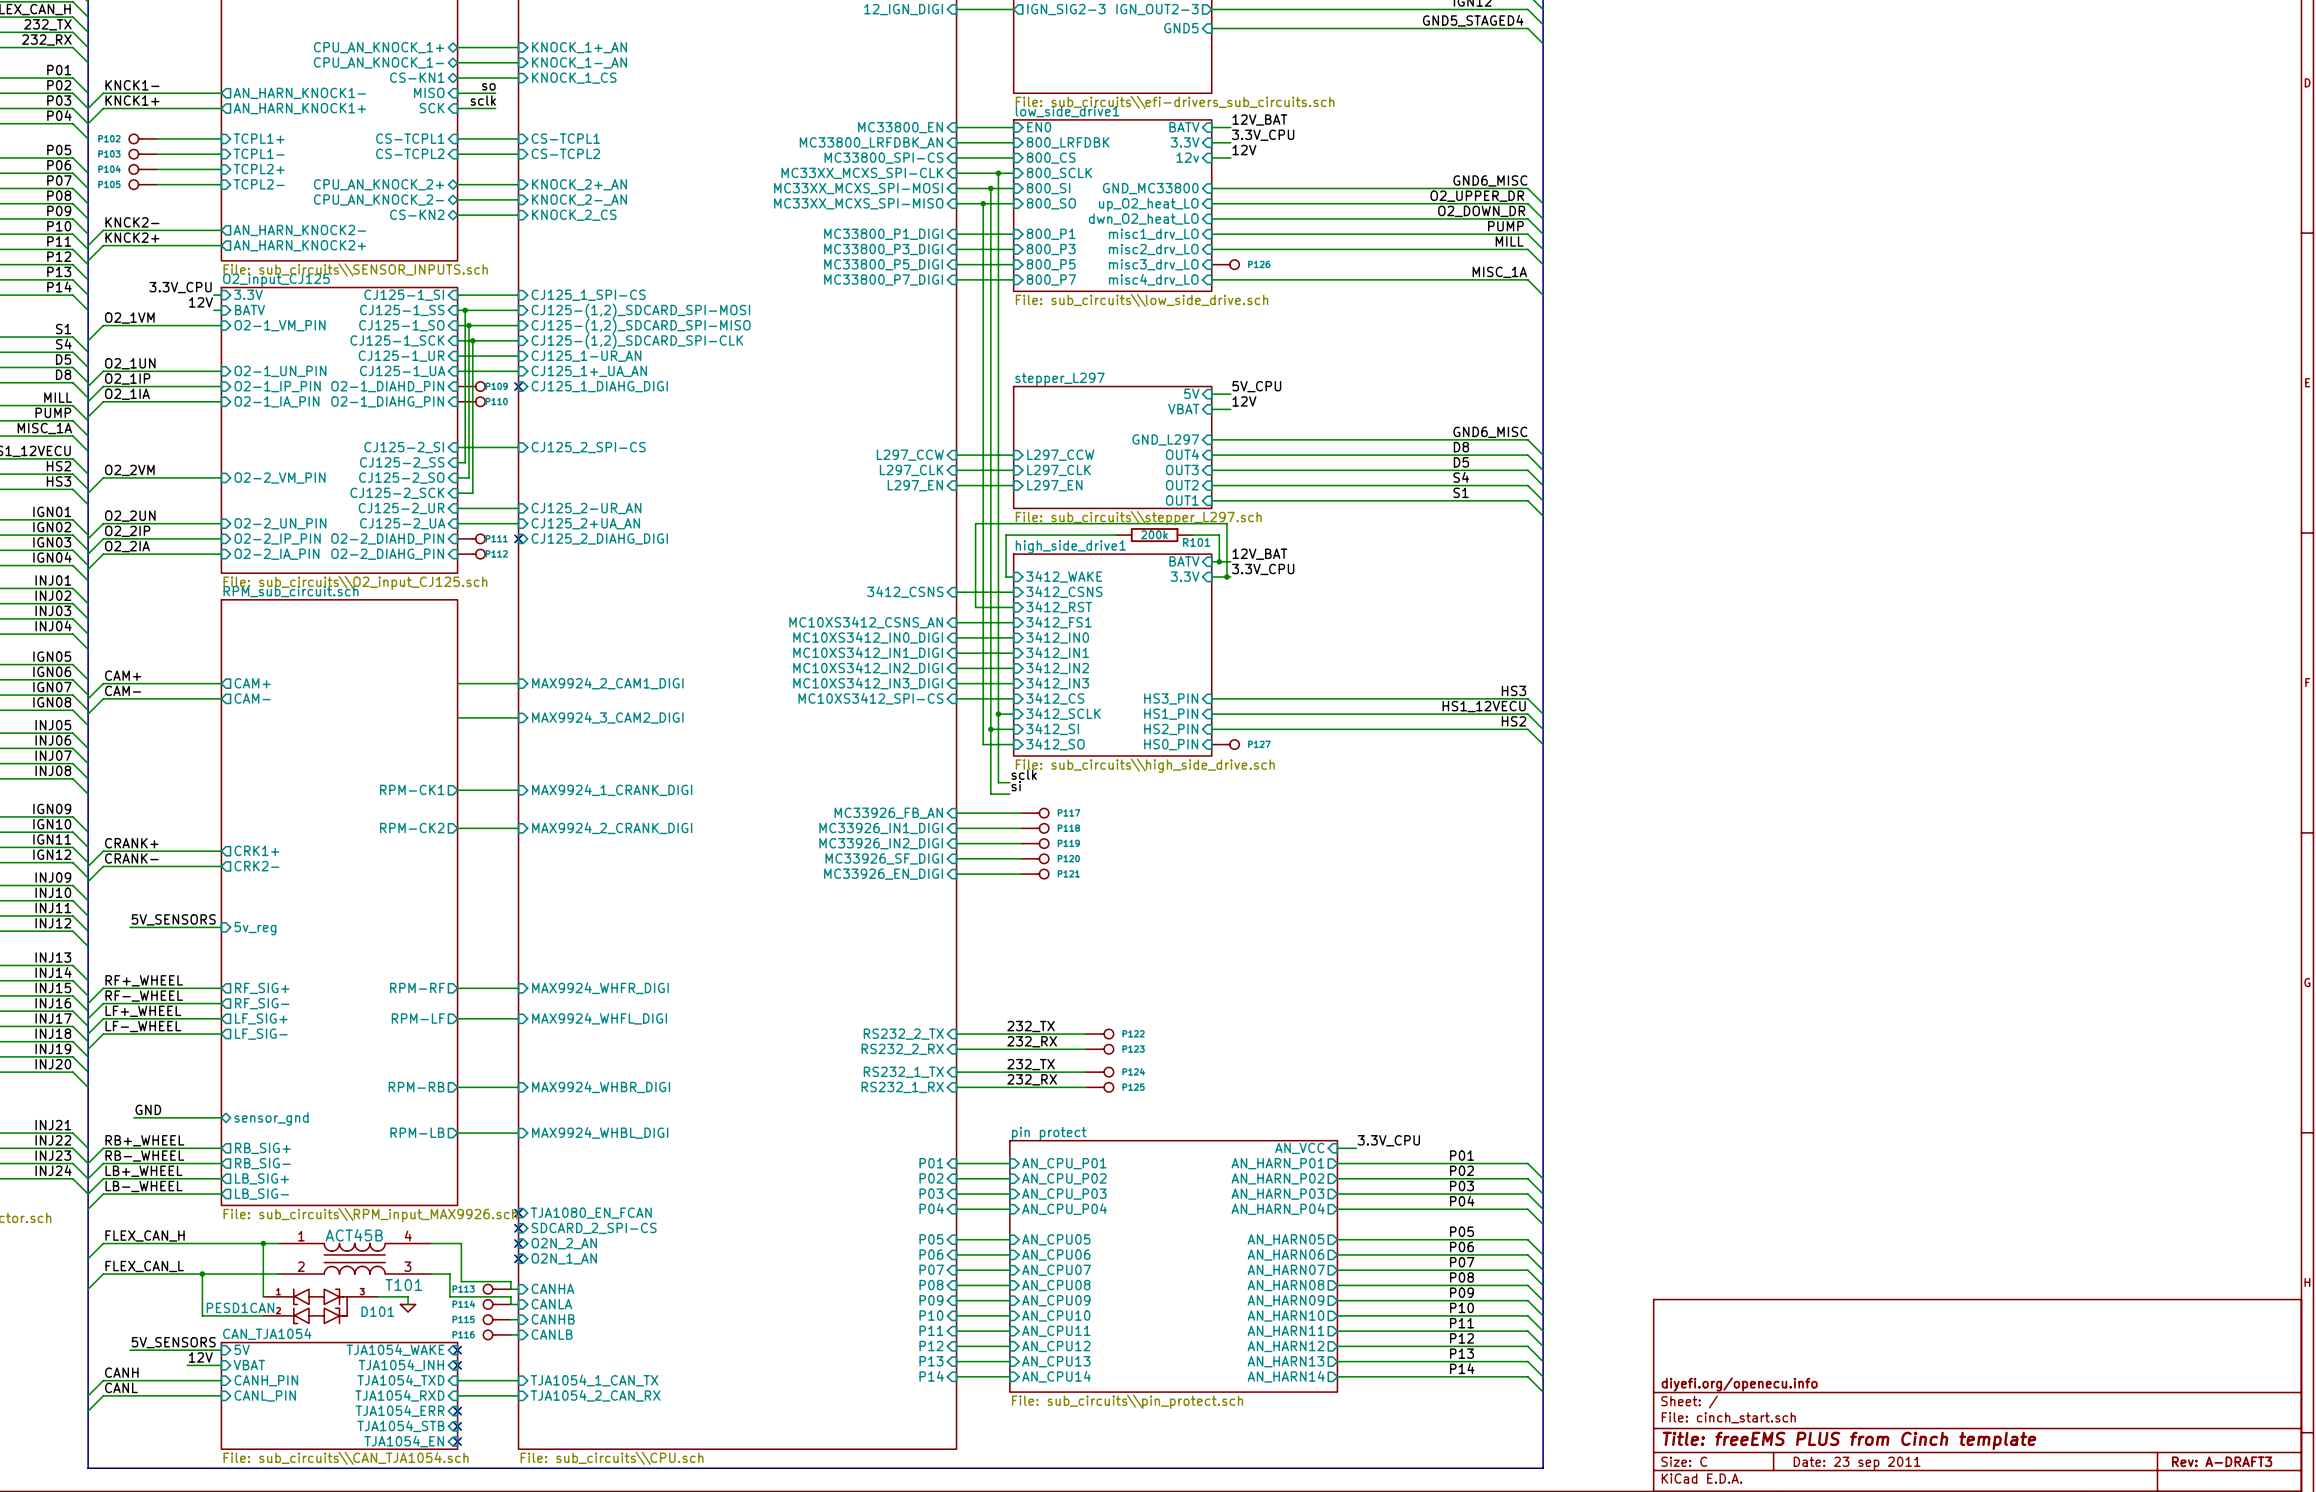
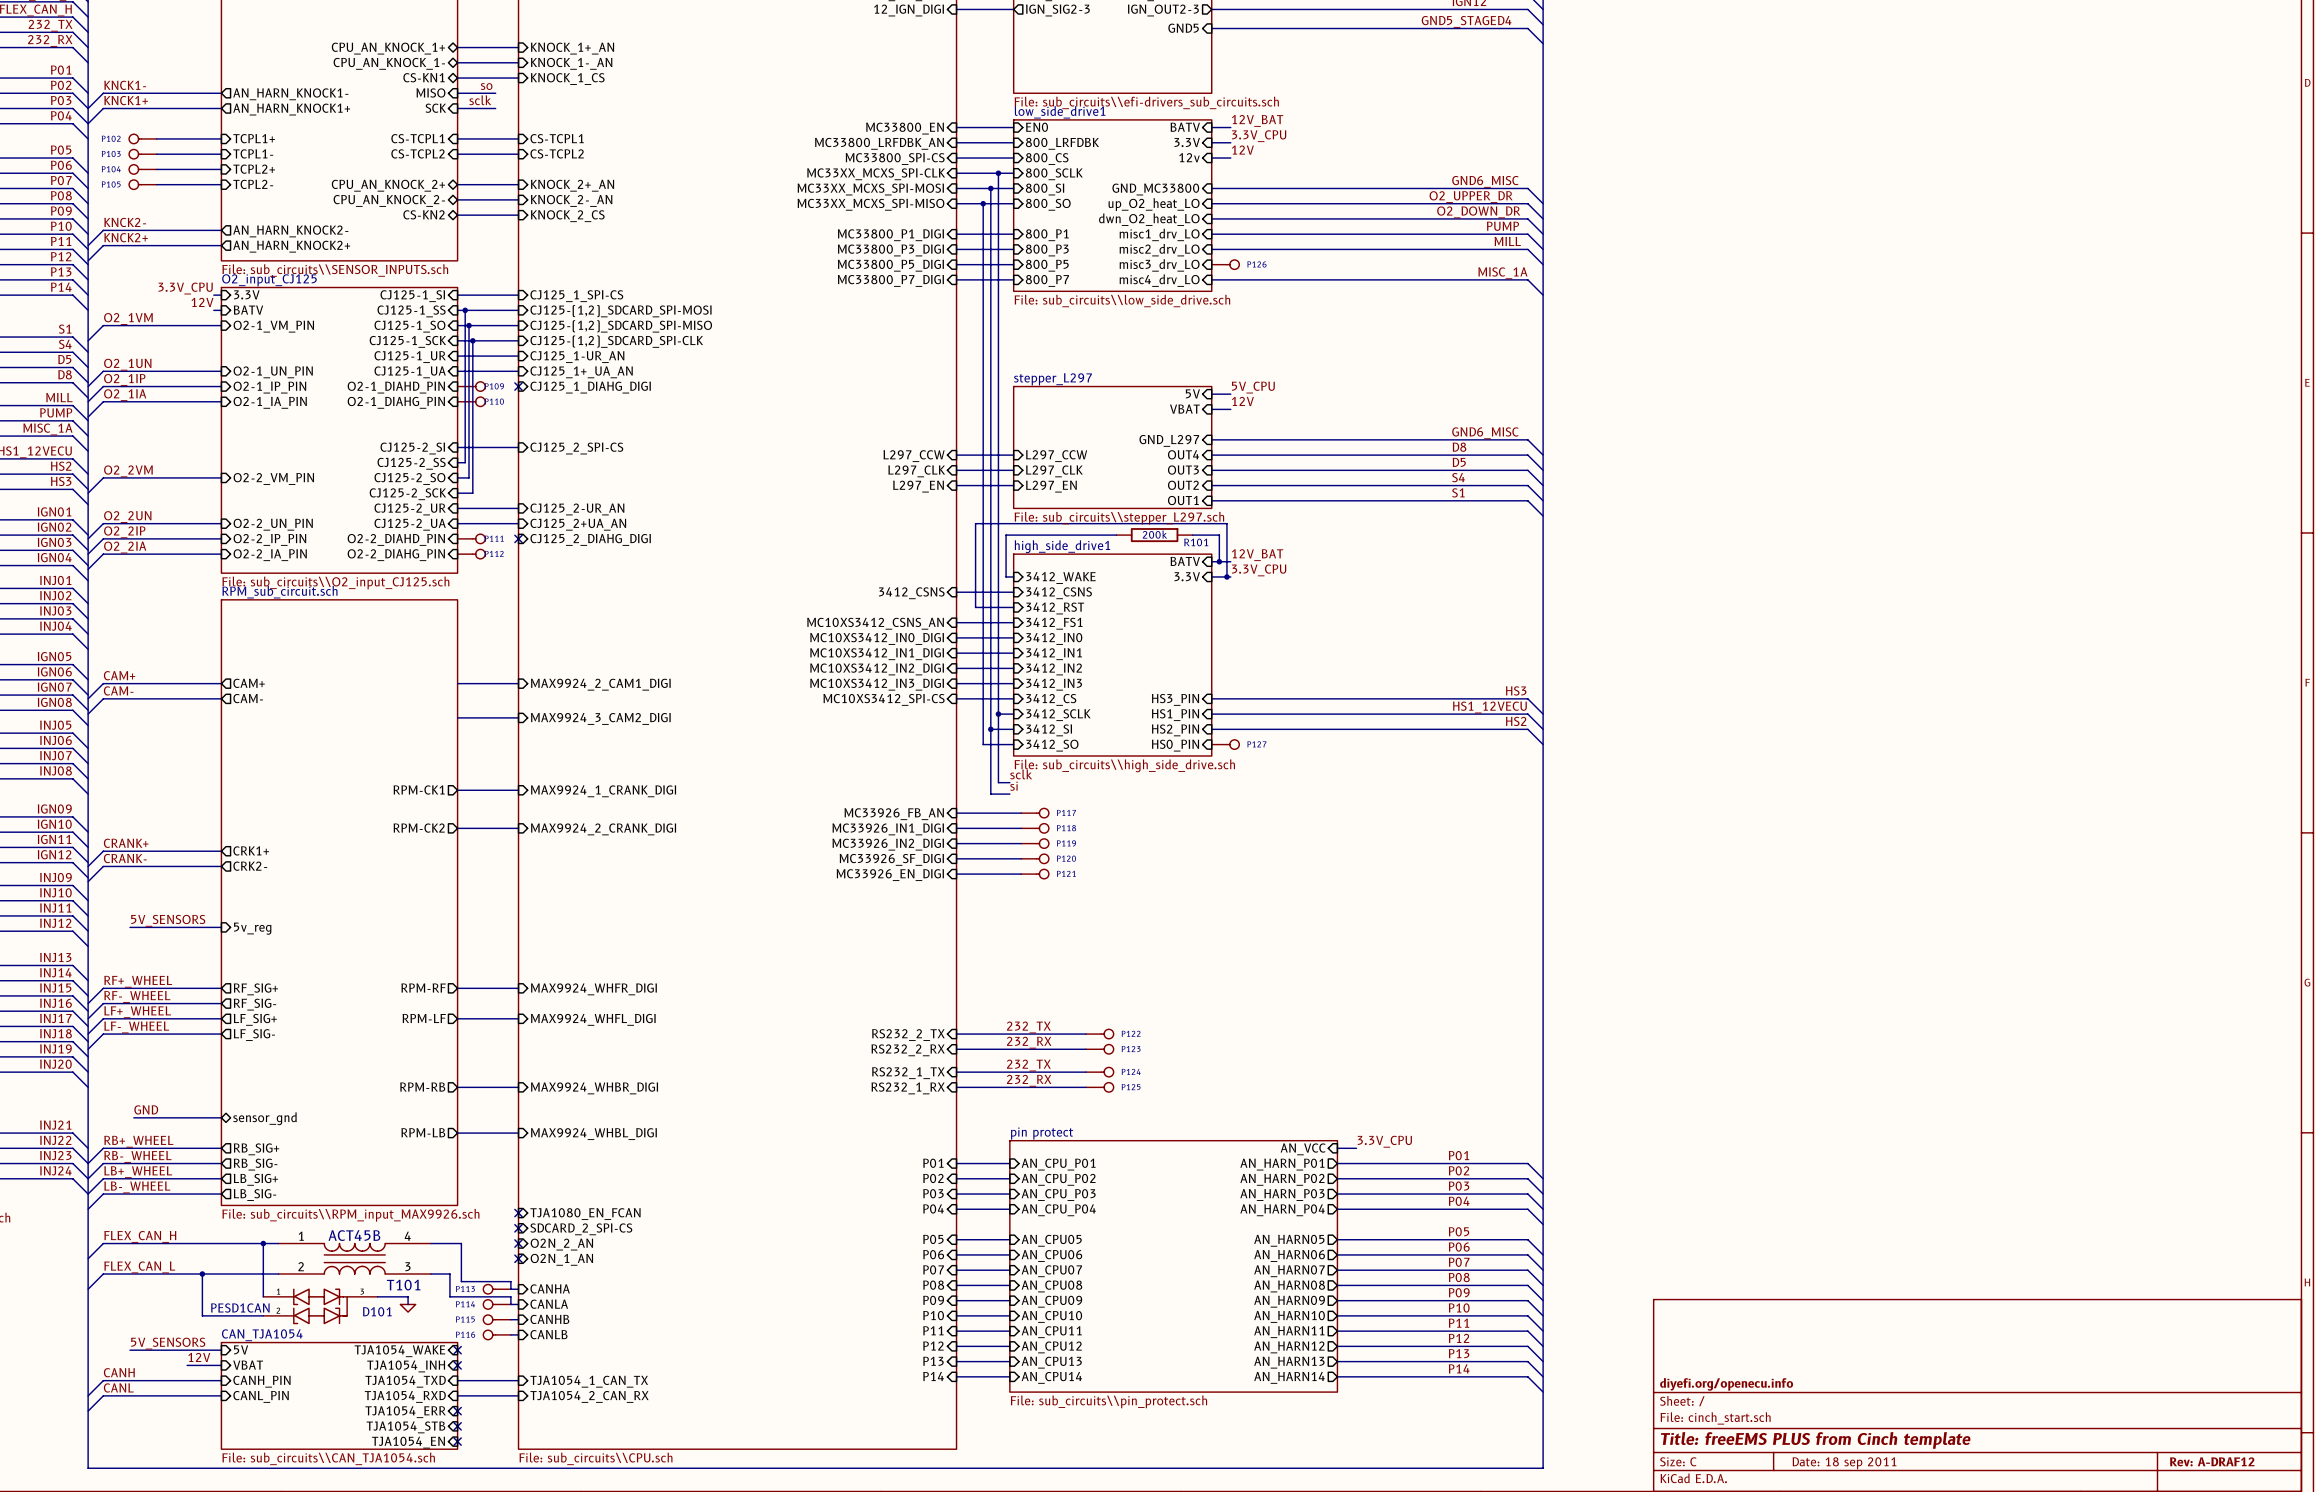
title block: Rev: A-DRAFT3 (2222, 1461) -> Rev: A-DRAF12 (2212, 1461)
title block: Date: 23 sep 2011 (1857, 1463) -> Date: 18 sep 2011 (1844, 1463)

